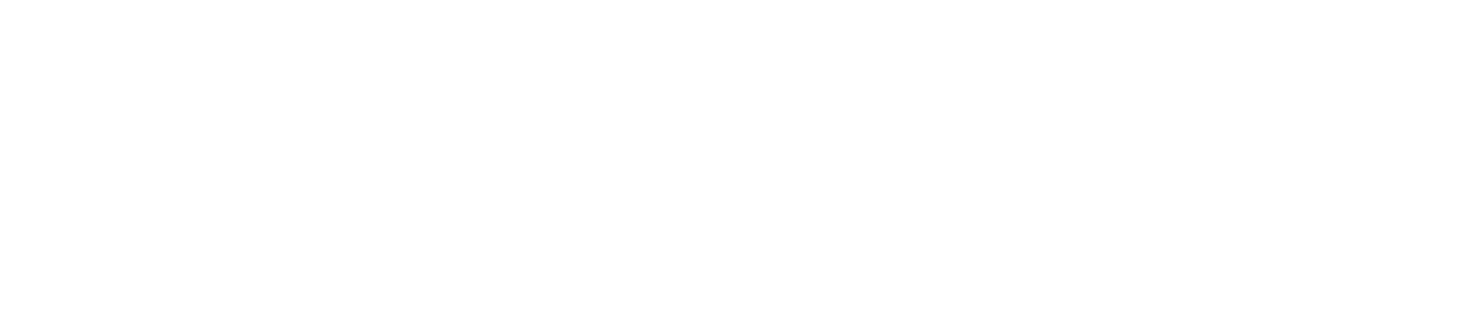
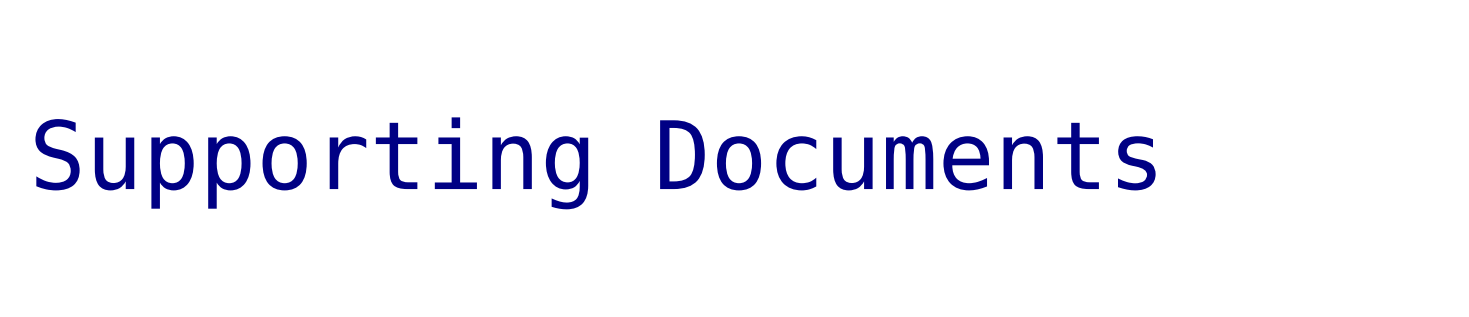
text: none -> Supporting Documents (595, 163)

